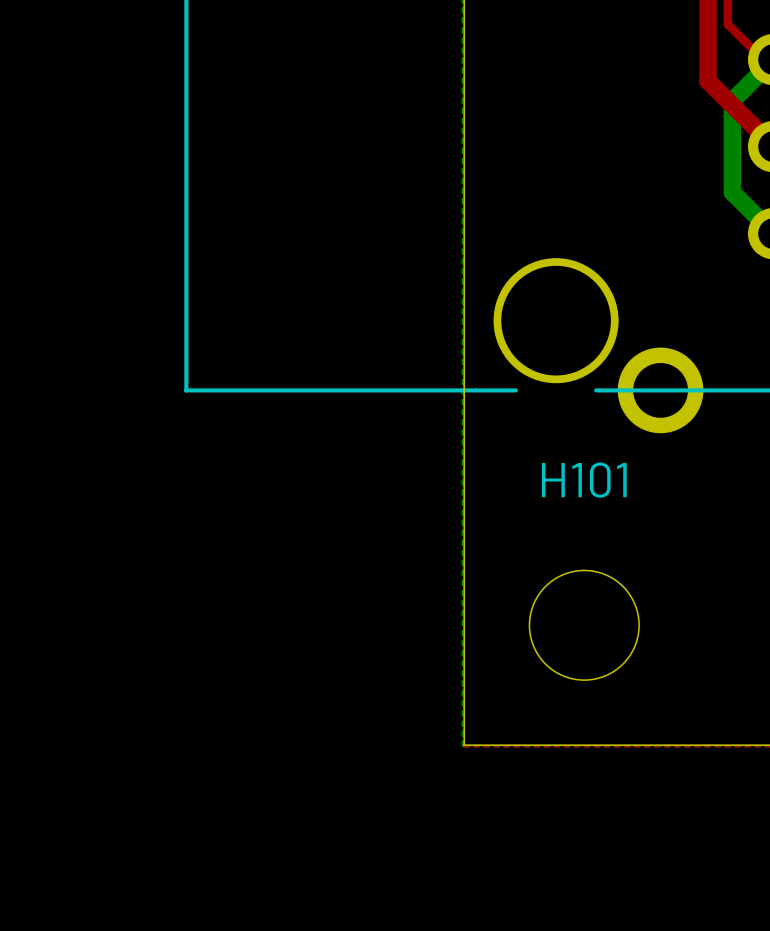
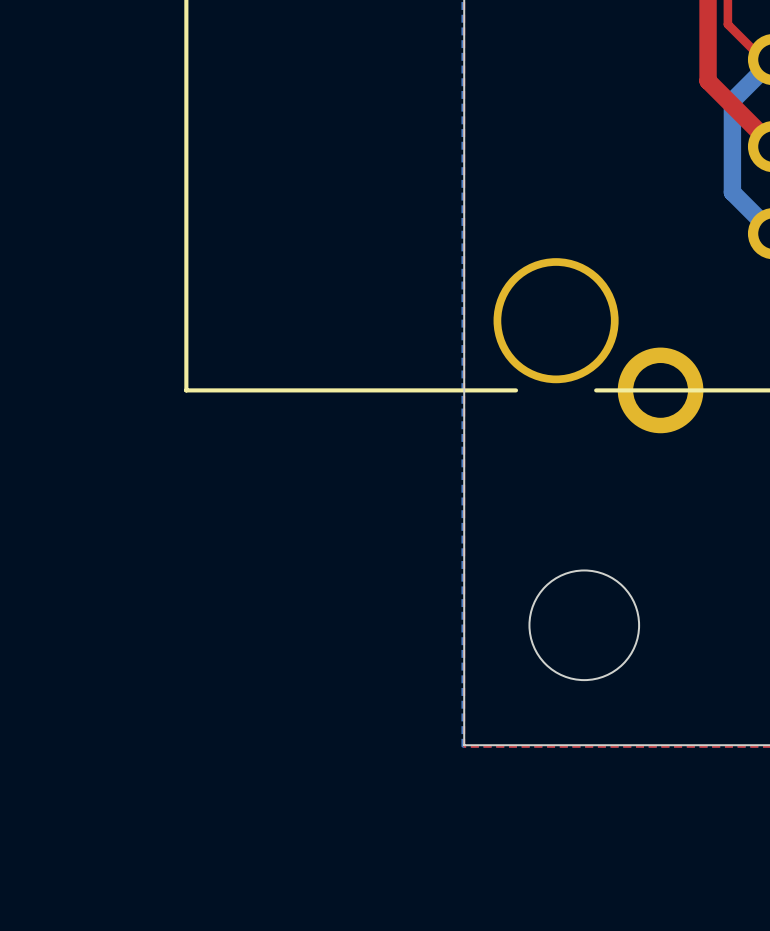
H101 name: H101 (584, 480) -> none

